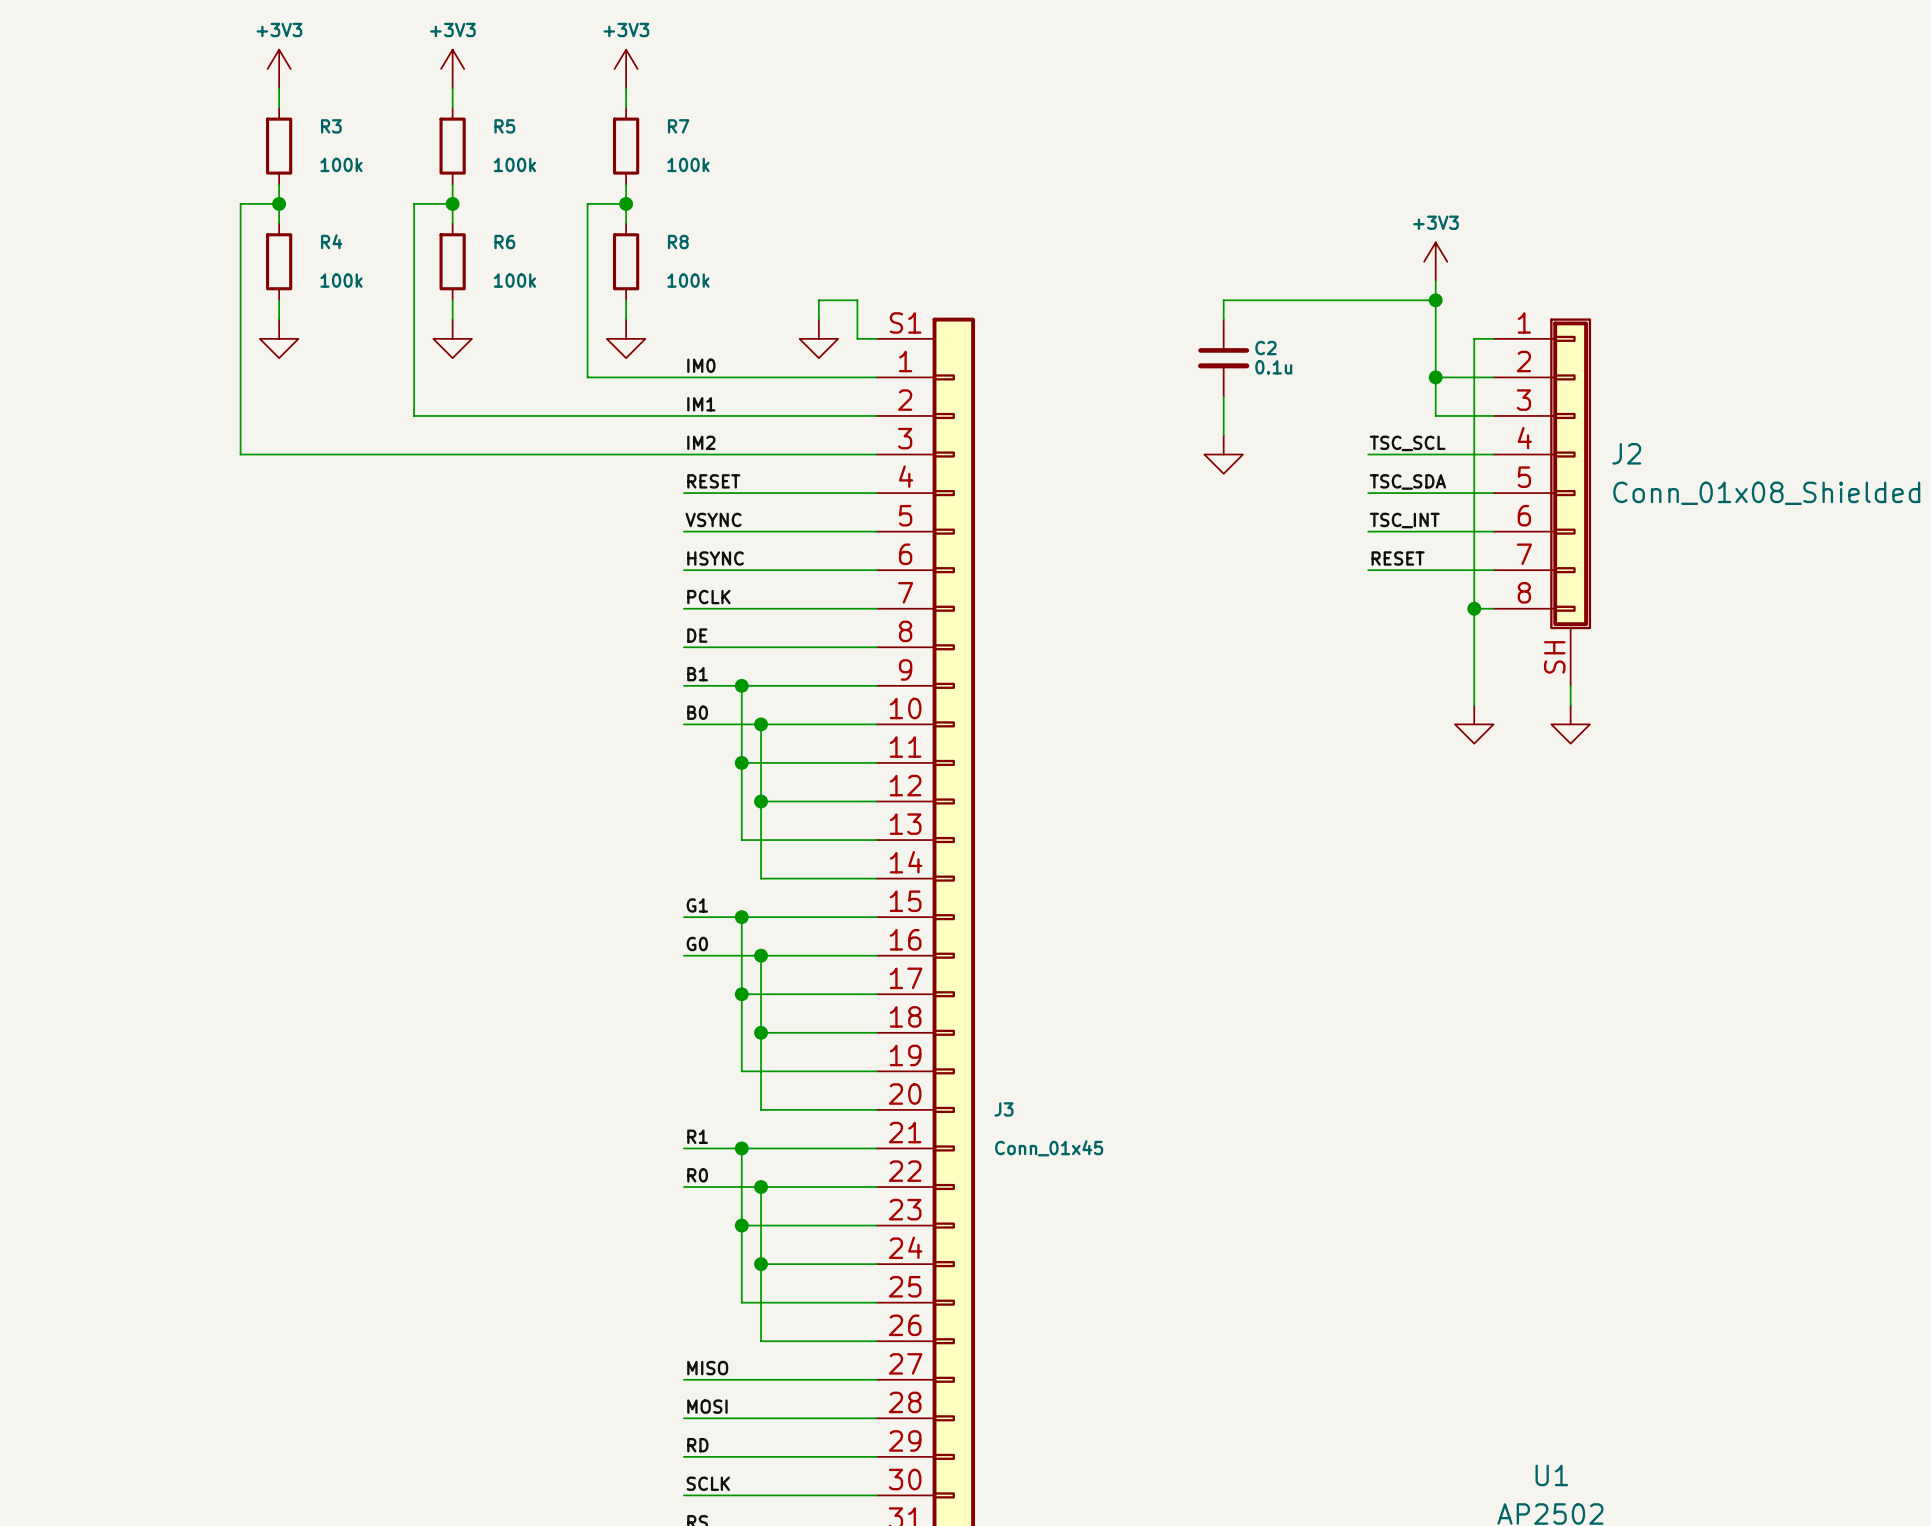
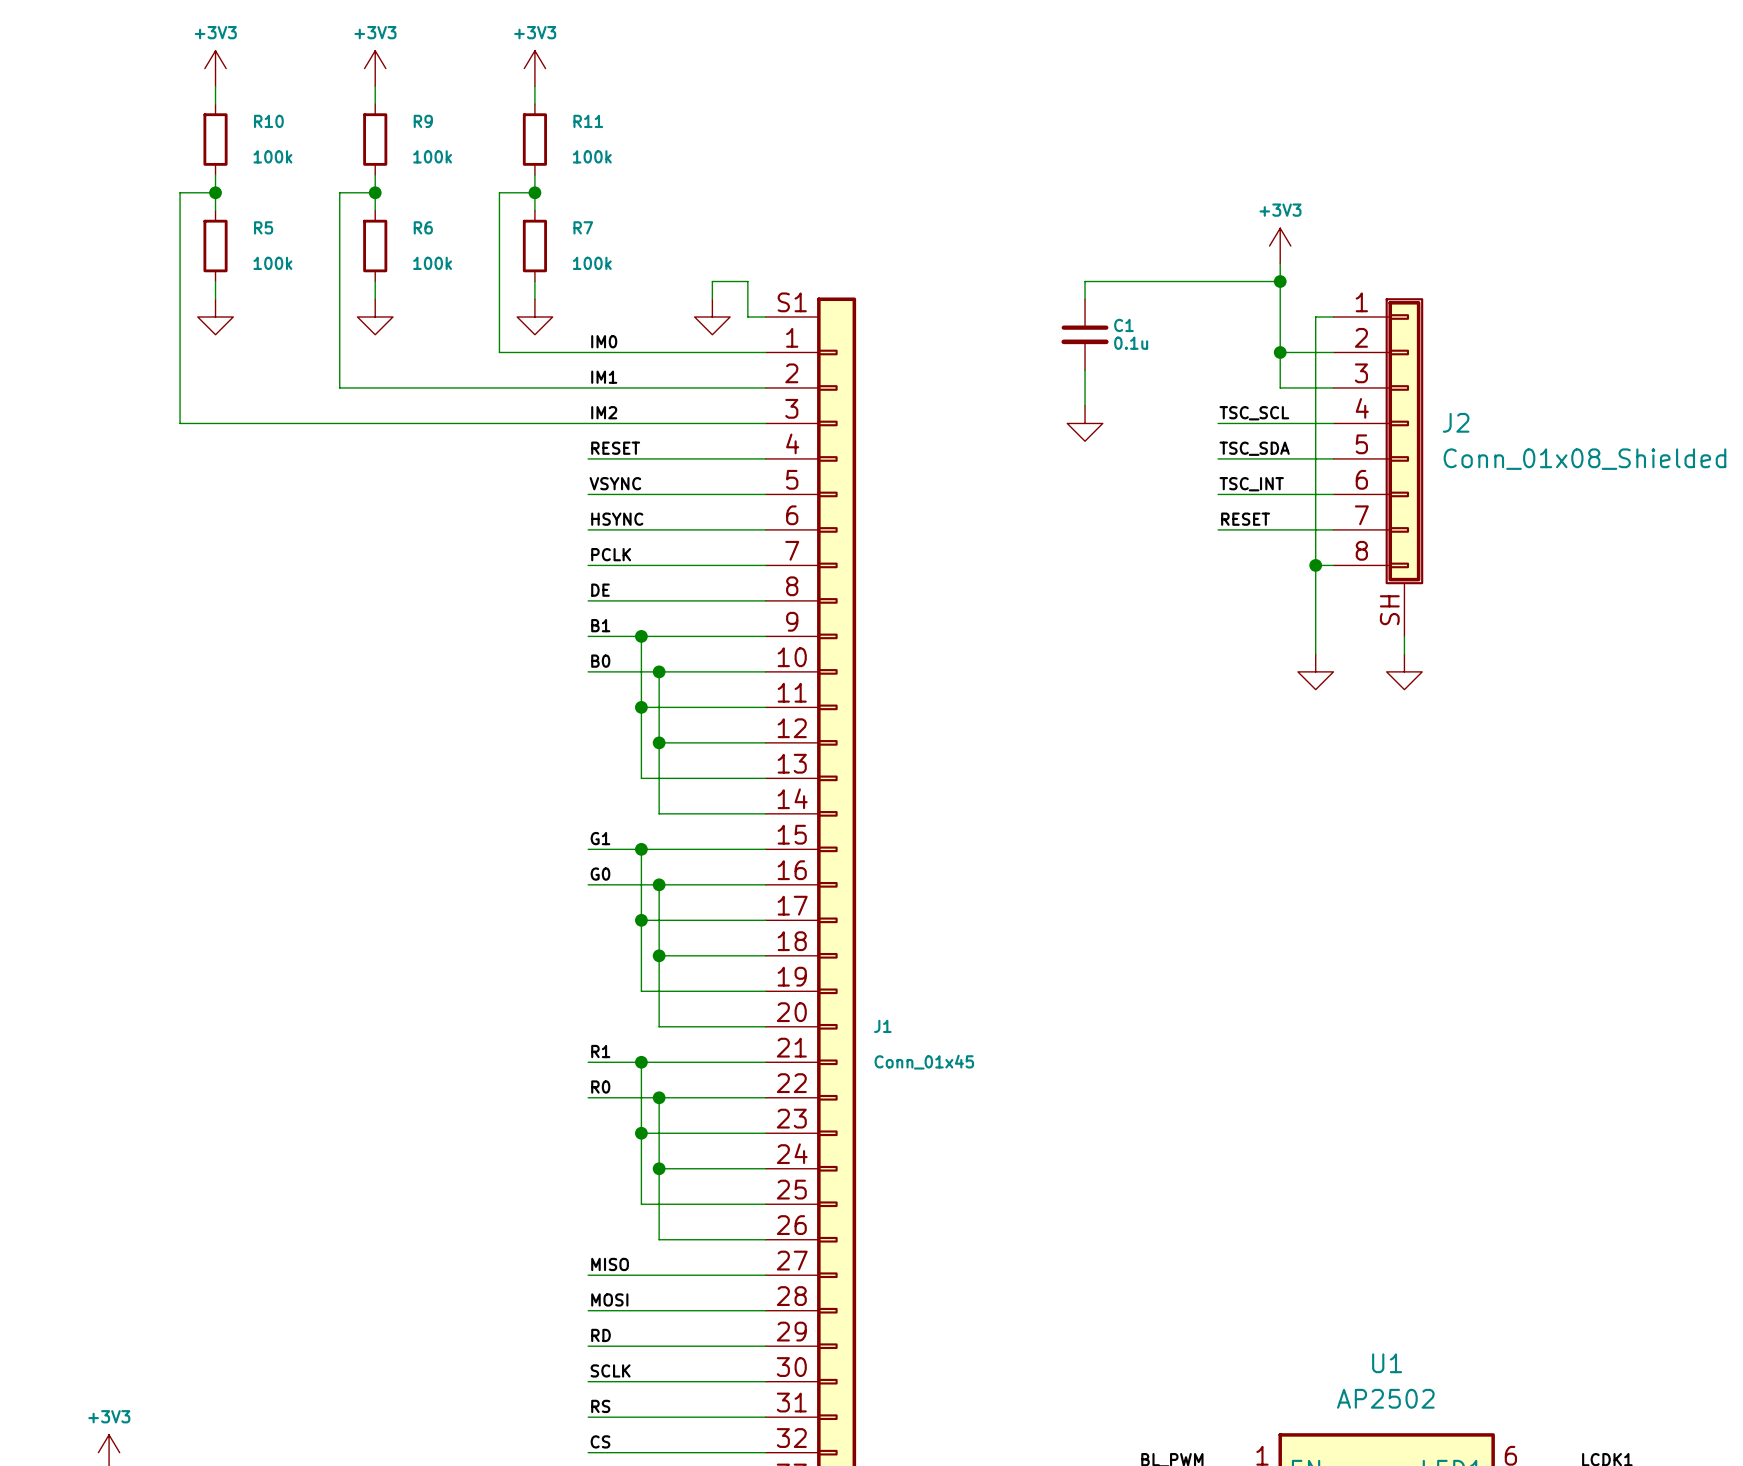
R3 name: R3 (331, 126) -> R10 (268, 121)
R5 name: R5 (504, 126) -> R9 (423, 121)
R7 name: R7 (678, 126) -> R11 (588, 121)
R4 name: R4 (331, 241) -> R5 (263, 227)
R8 name: R8 (678, 242) -> R7 (583, 227)
C2 name: C2 (1265, 348) -> C1 (1123, 325)
J3 name: J3 (1004, 1109) -> J1 (882, 1026)

